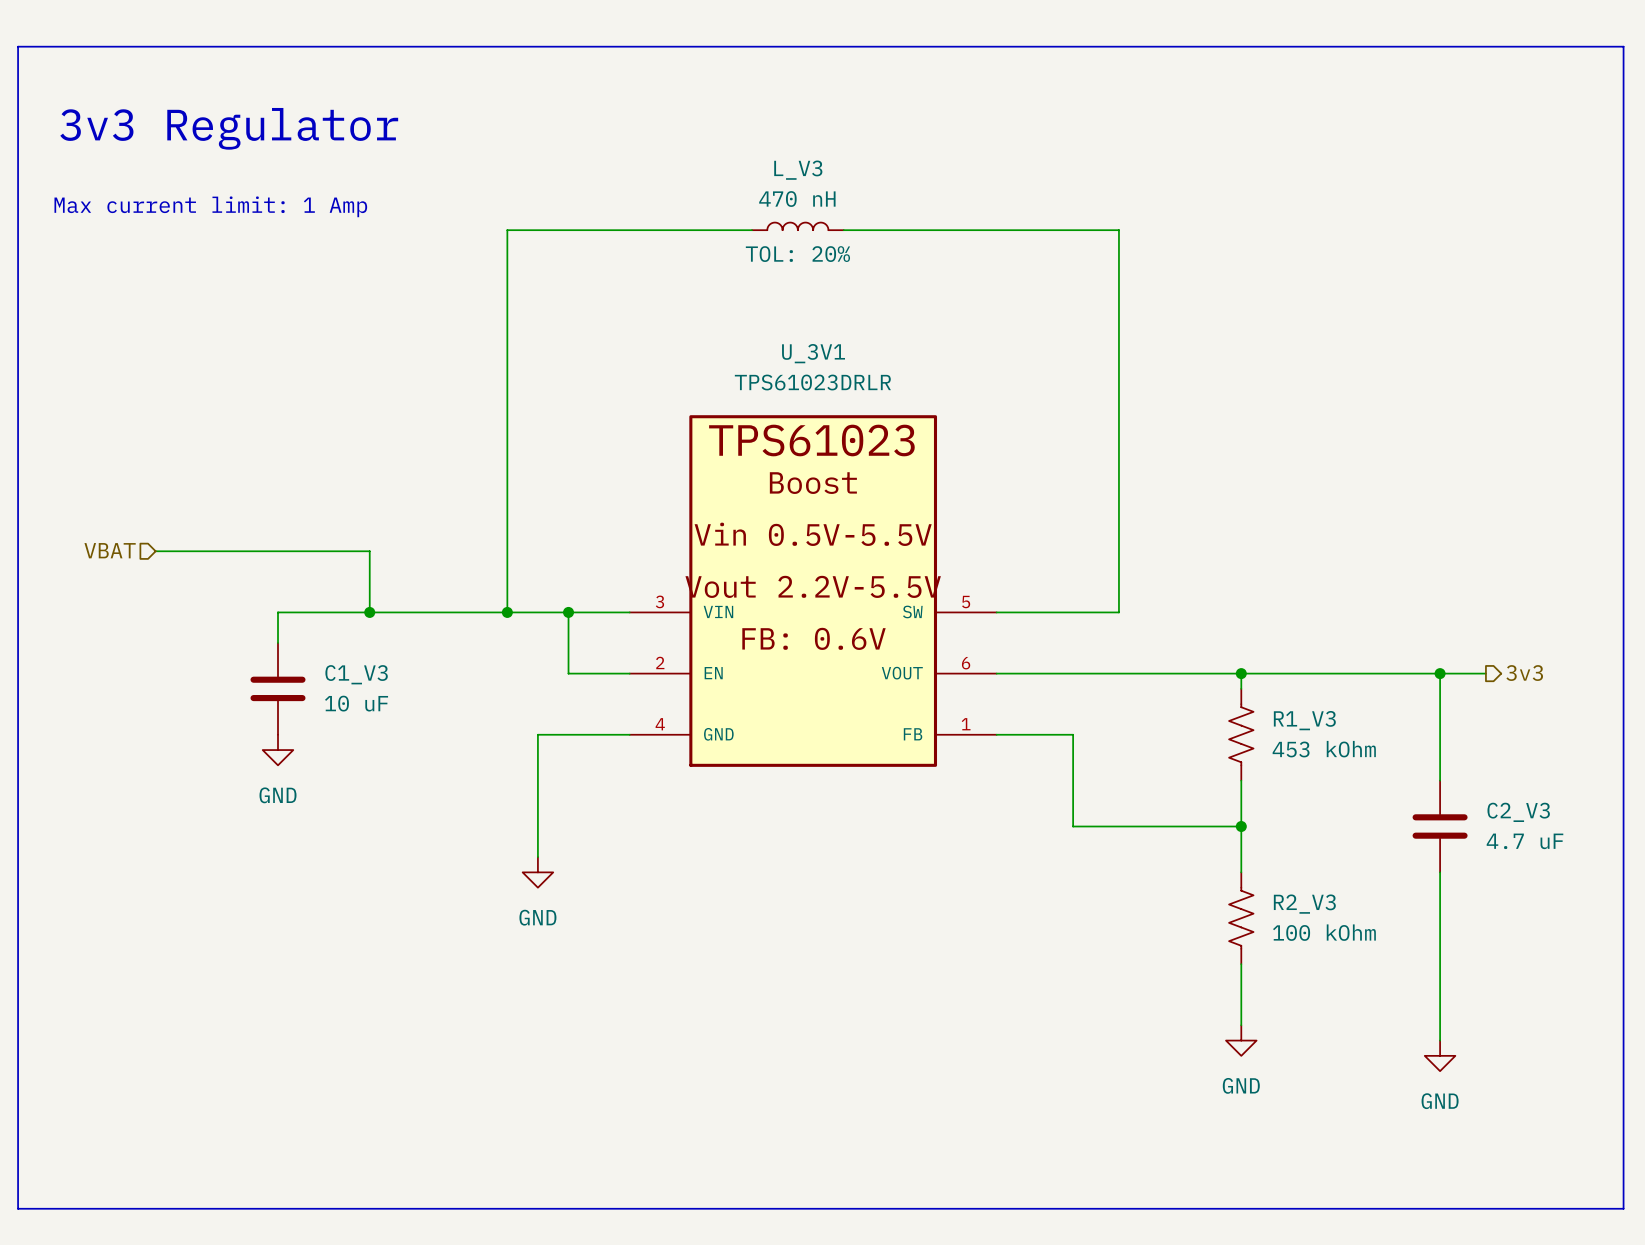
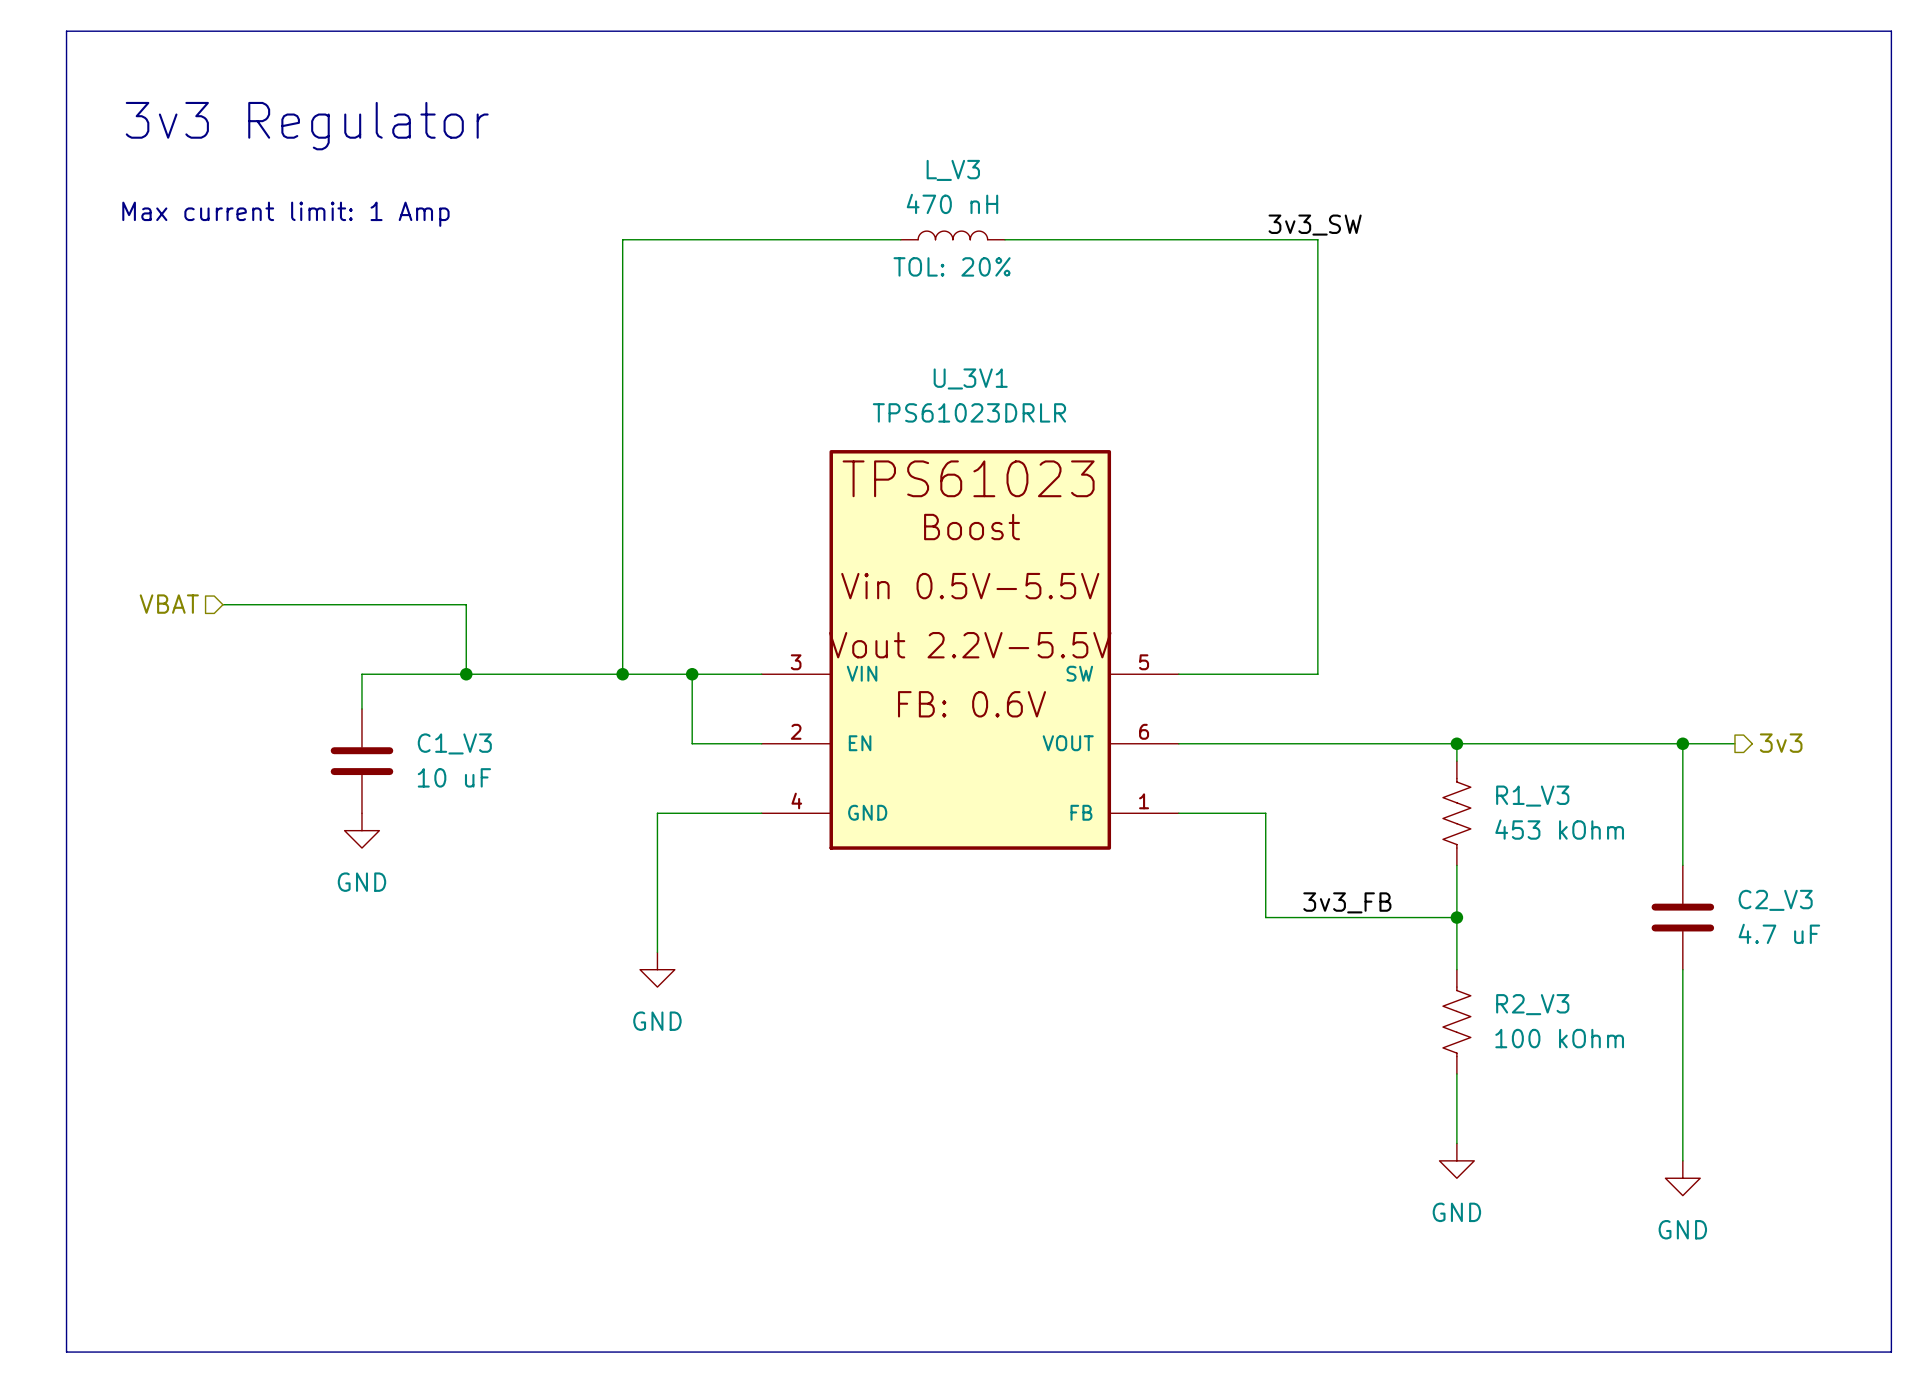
label: none -> 3v3_SW (1315, 225)
label: none -> 3v3_FB (1347, 902)

